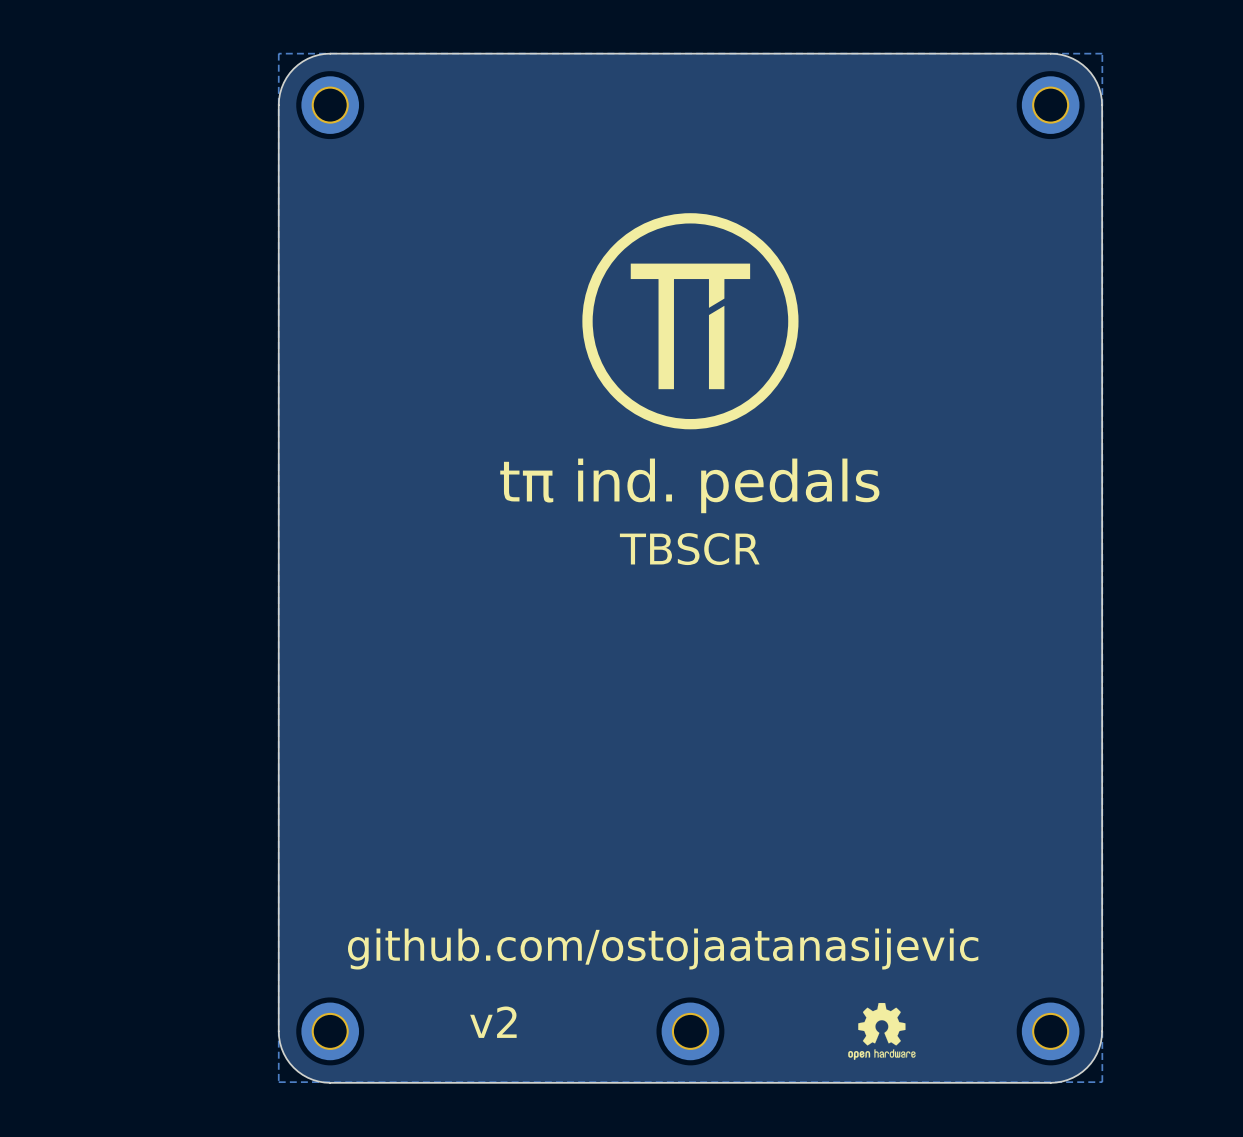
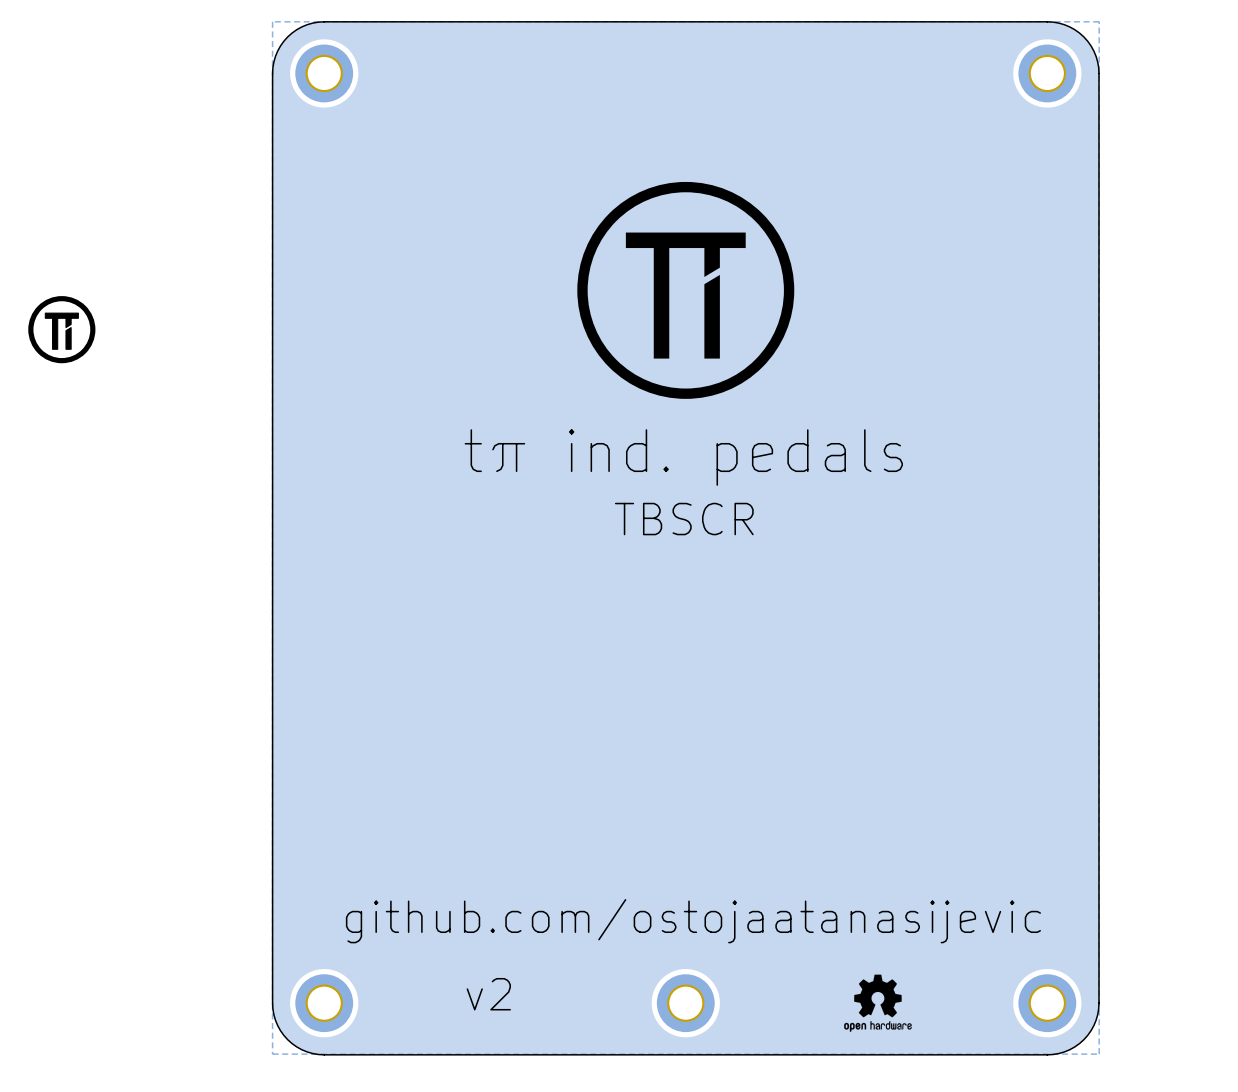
drawing: none -> [28, 296, 96, 364]

